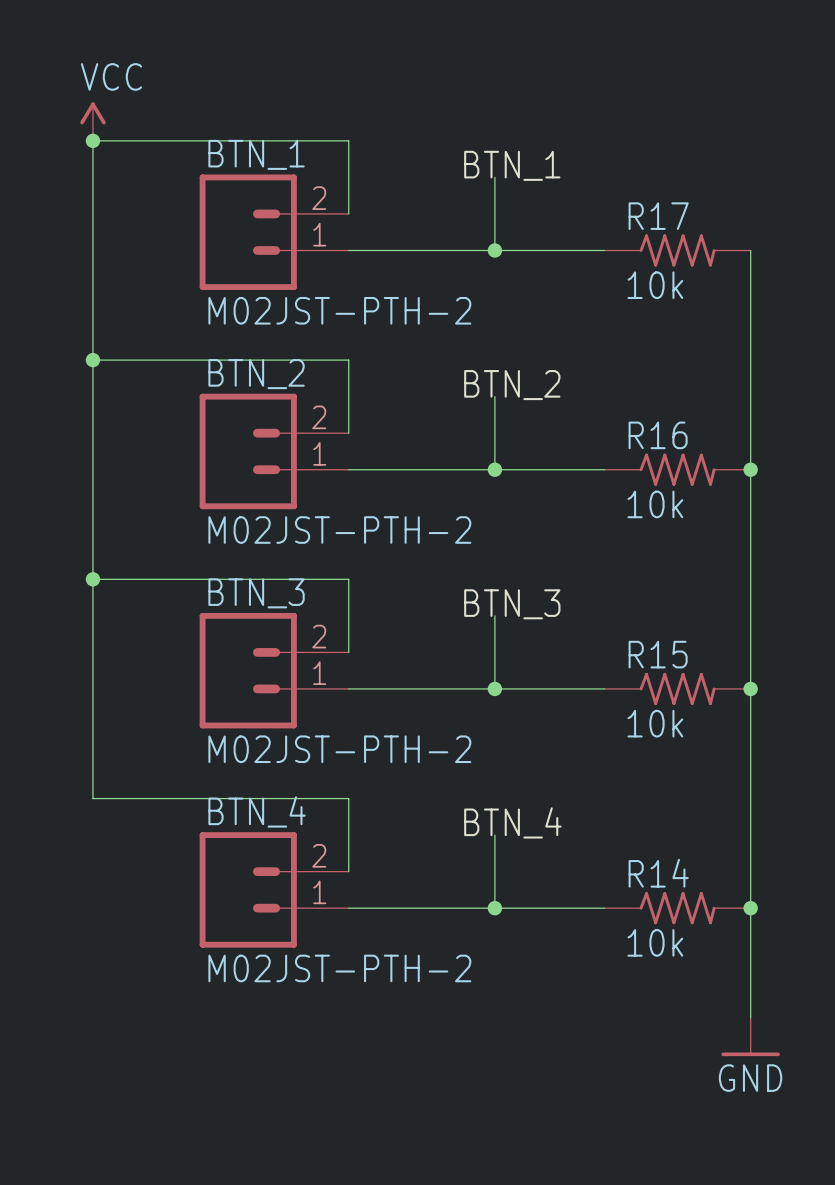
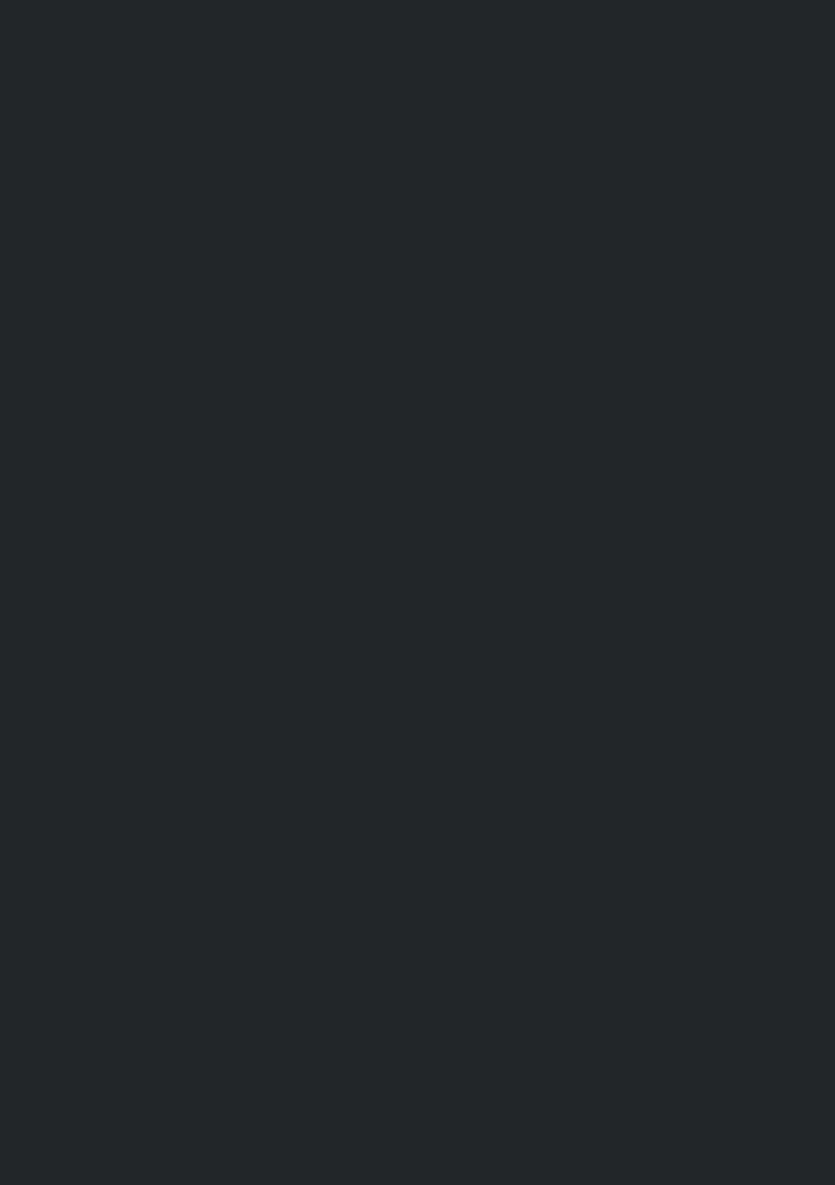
power symbol: VCC (92, 121) -> none
junction: (92, 140) -> none
label: BTN_1 (512, 165) -> none
wire: (494, 177) (494, 250) -> none
wire: (348, 213) (348, 140) (92, 140) (92, 798) (348, 798) (348, 871) -> none
BTN_1: M02JST-PTH-2 (274, 232) -> none
wire: (348, 250) (604, 250) -> none
junction: (494, 250) -> none
R17: 10k (677, 250) -> none
wire: (750, 250) (750, 1017) -> none
wire: (92, 360) (348, 360) (348, 433) -> none
junction: (92, 360) -> none
label: BTN_2 (512, 385) -> none
wire: (494, 396) (494, 469) -> none
BTN_2: M02JST-PTH-2 (274, 451) -> none
wire: (348, 469) (604, 469) -> none
junction: (494, 469) -> none
R16: 10k (677, 469) -> none
junction: (750, 469) -> none
wire: (92, 579) (348, 579) (348, 652) -> none
junction: (92, 579) -> none
label: BTN_3 (512, 604) -> none
wire: (494, 615) (494, 688) -> none
BTN_3: M02JST-PTH-2 (274, 670) -> none
wire: (348, 688) (604, 688) -> none
junction: (494, 688) -> none
R15: 10k (677, 688) -> none
junction: (750, 688) -> none
label: BTN_4 (512, 822) -> none
wire: (494, 835) (494, 908) -> none
BTN_4: M02JST-PTH-2 (274, 889) -> none
wire: (348, 908) (604, 908) -> none
junction: (494, 908) -> none
R14: 10k (677, 908) -> none
junction: (750, 908) -> none
power symbol: GND (750, 1036) -> none

